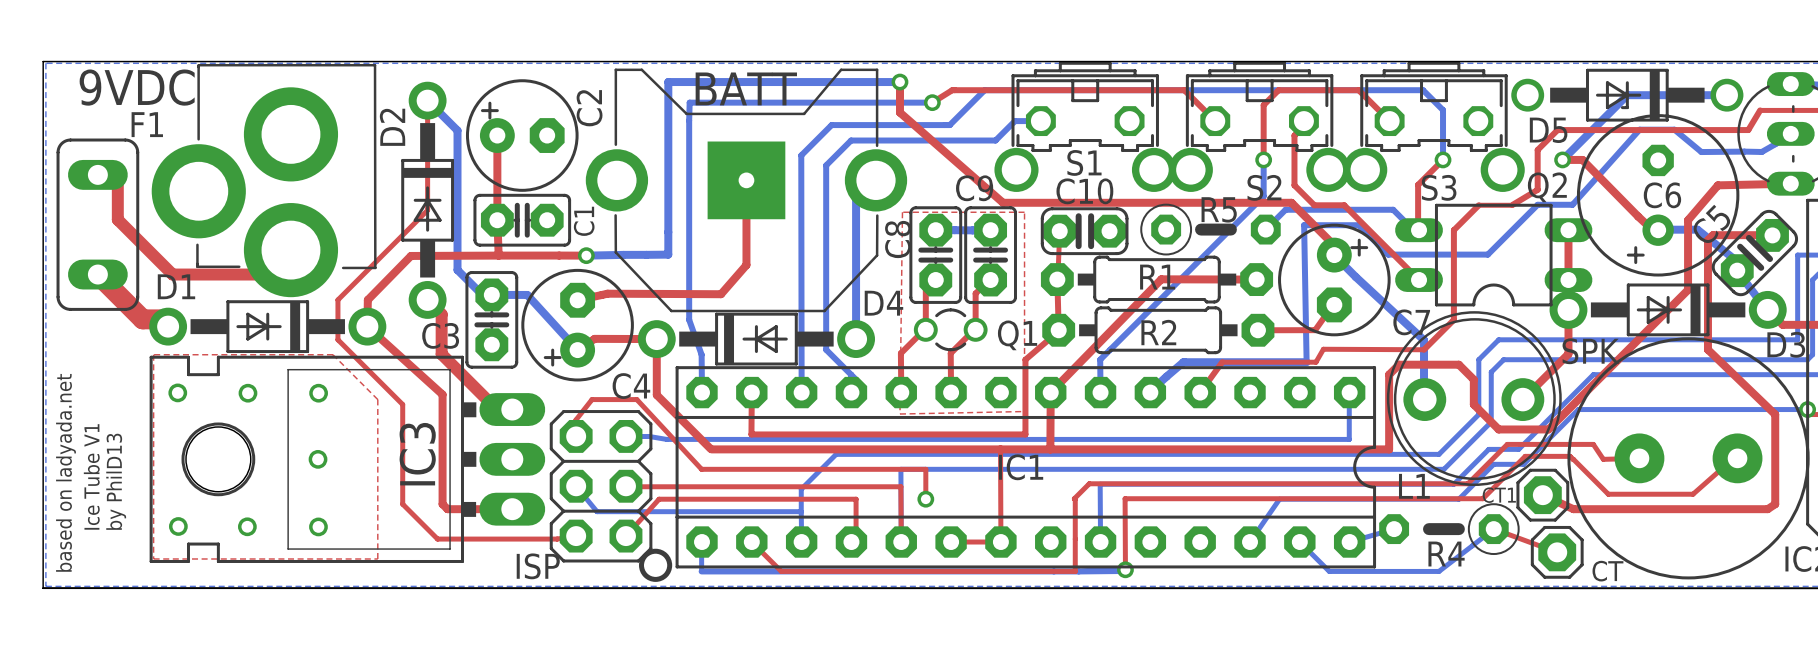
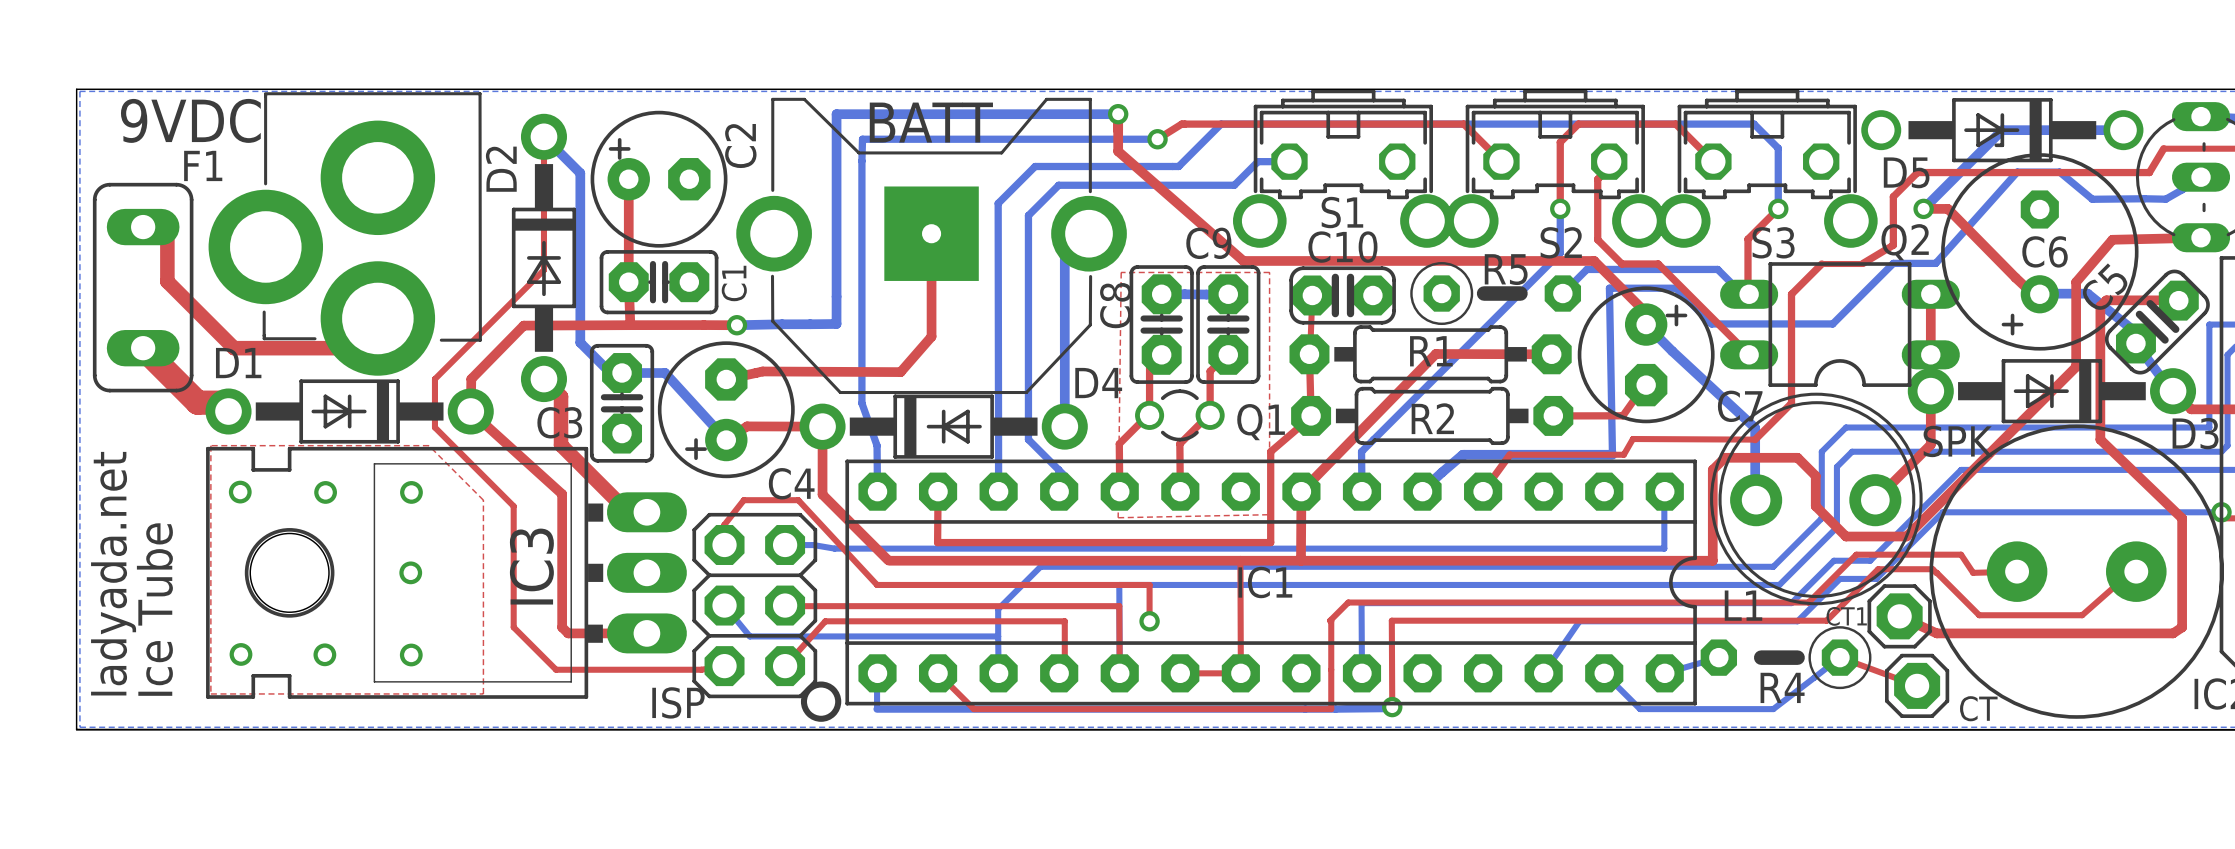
text: based on ladyada.net (65, 472) -> ladyada.net (113, 573)
text: Ice Tube V1 (91, 476) -> Ice Tube (154, 609)
text: by PhilD13 (116, 481) -> none

